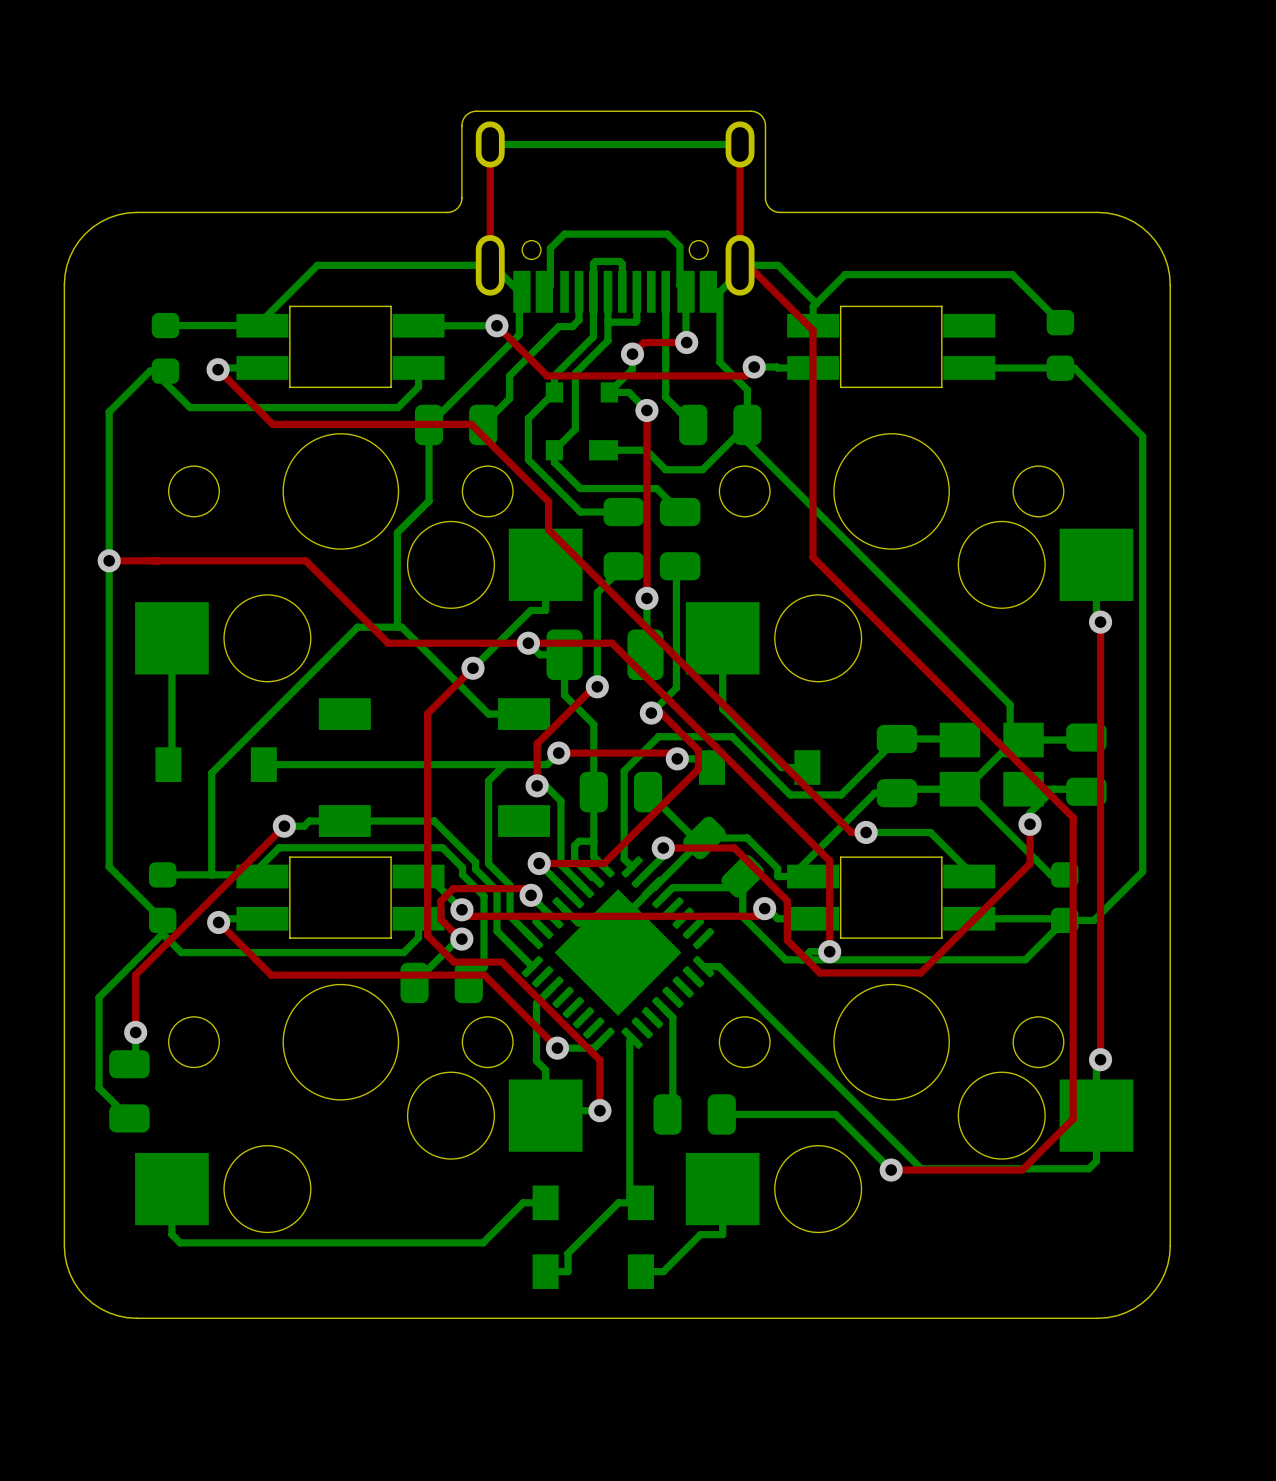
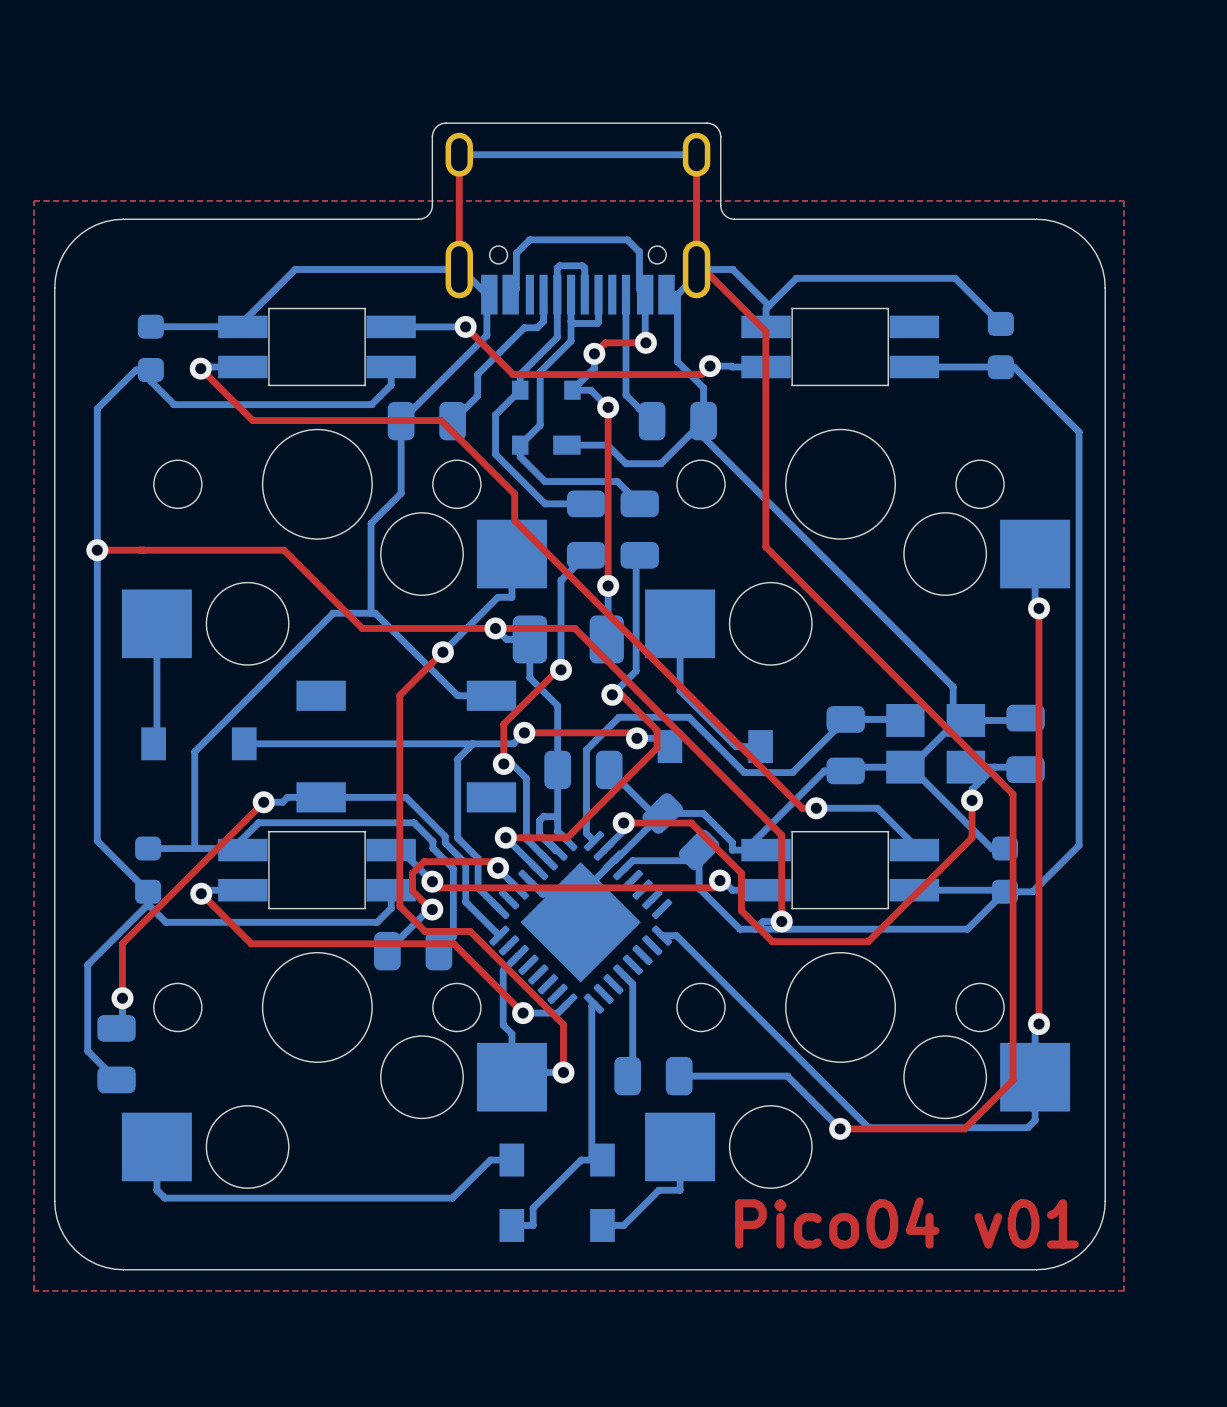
top zone outline: none -> (33, 200) (33, 1290) (1123, 1290) (1123, 200) (33, 200)
text: none -> Pico04 v01 (906, 1222)

